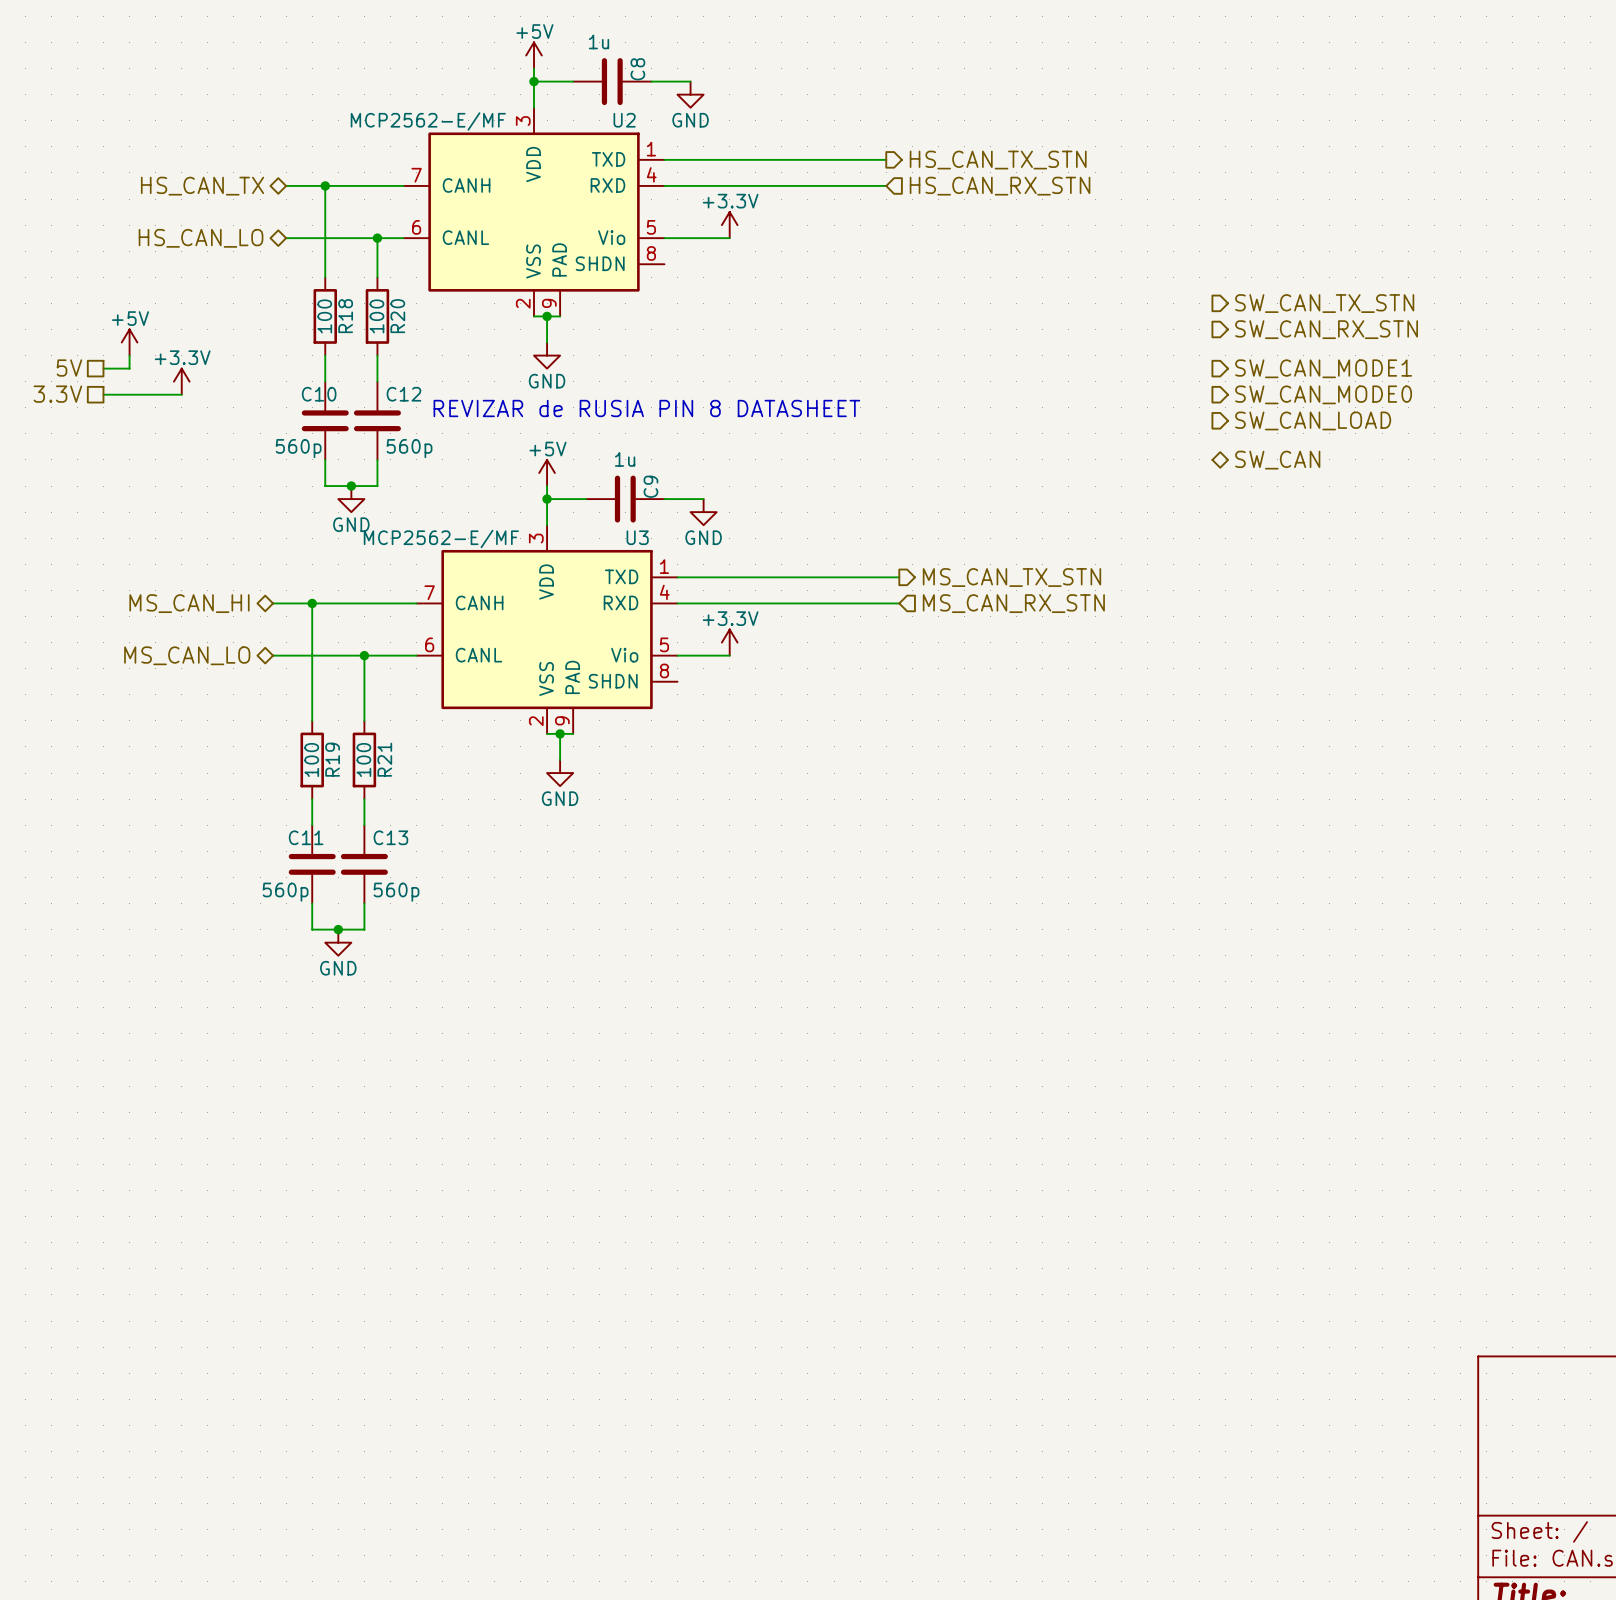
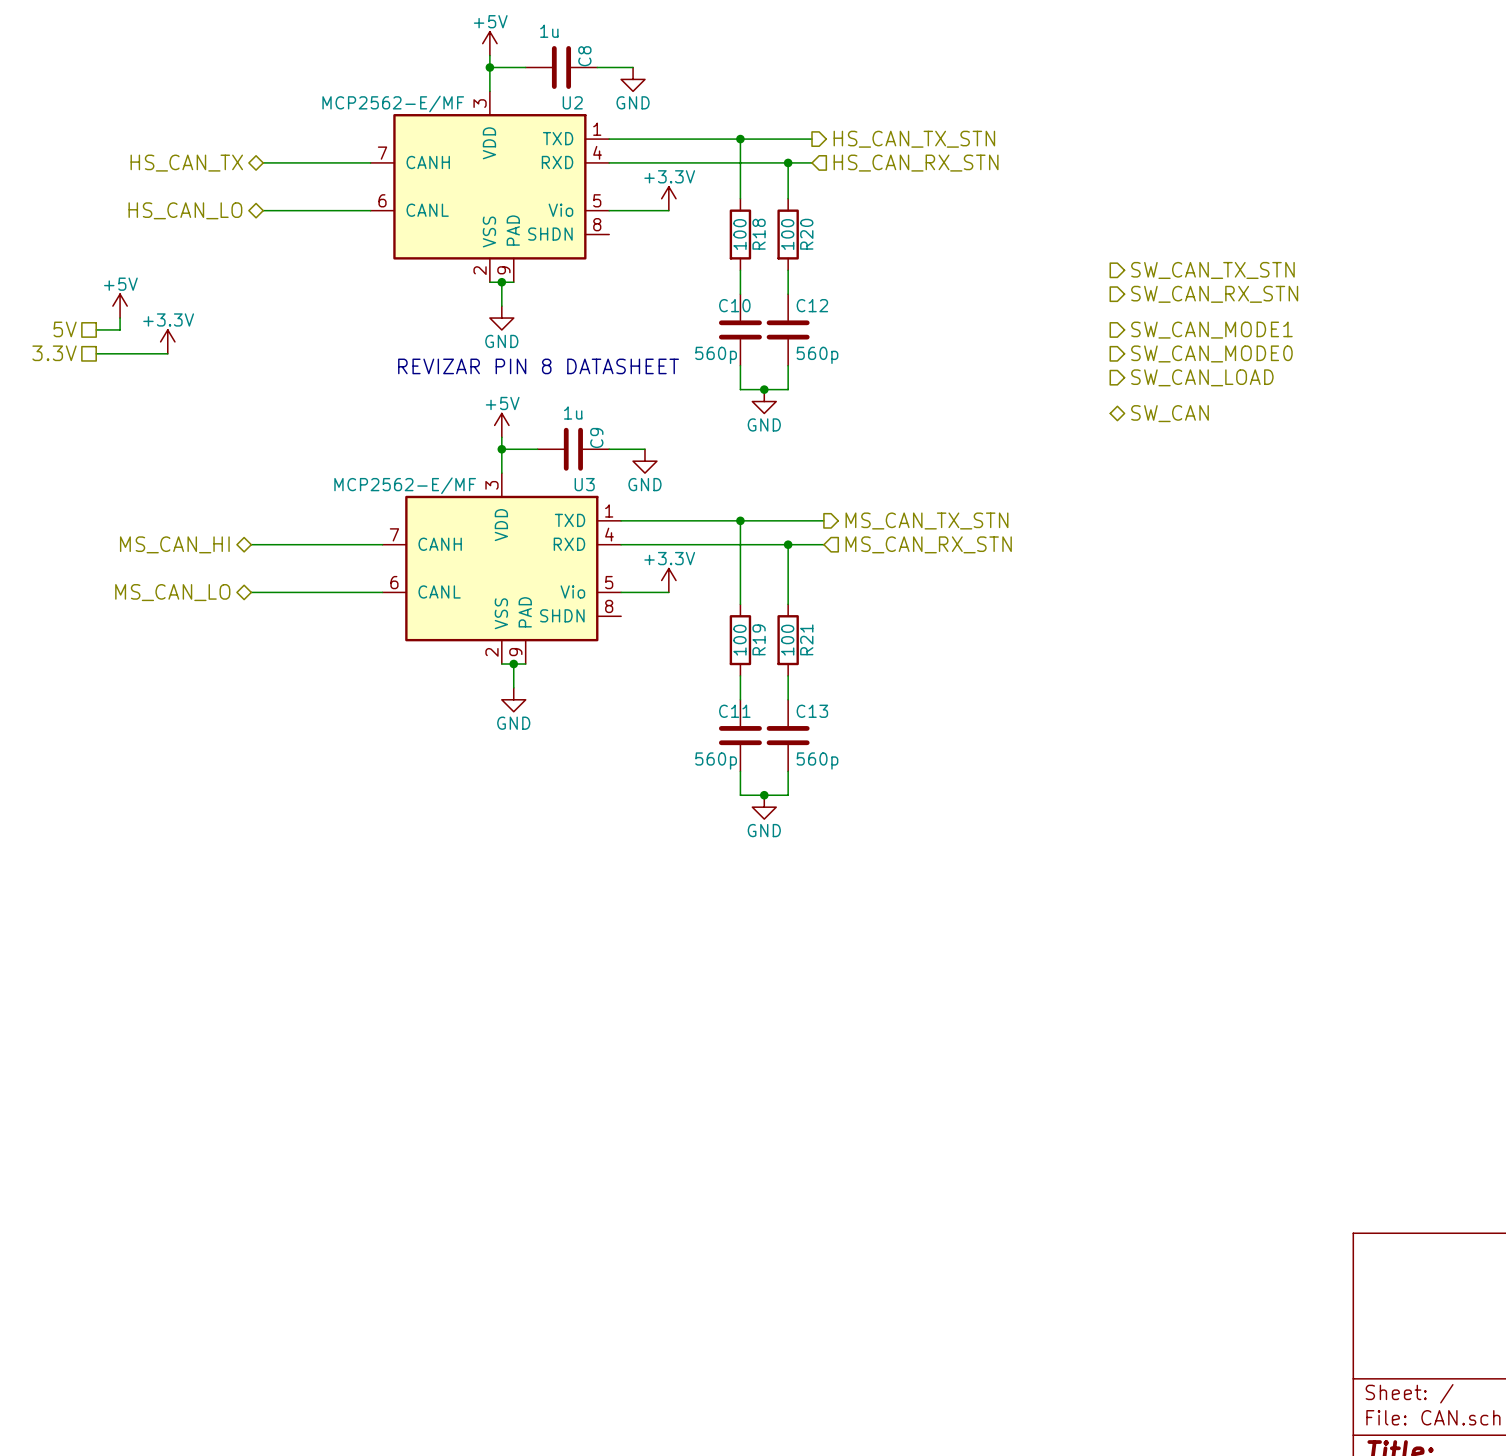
wire: none -> (740, 139) (740, 198)
junction: none -> (740, 139)
wire: (325, 185) (325, 277) -> none
junction: (325, 185) -> none
wire: none -> (788, 162) (788, 198)
junction: none -> (788, 162)
wire: (377, 238) (377, 277) -> none
junction: (377, 238) -> none
wire: none -> (740, 270) (740, 294)
wire: none -> (788, 270) (788, 294)
R18 position: (325, 316) -> (740, 234)
R20 position: (377, 316) -> (788, 234)
wire: (325, 355) (325, 381) -> none
wire: (377, 355) (377, 381) -> none
wire: none -> (740, 365) (740, 389) (788, 389) (788, 365)
text: REVIZAR de RUSIA PIN 8 DATASHEET (646, 408) -> REVIZAR PIN 8 DATASHEET (538, 366)
C10 position: (325, 420) -> (740, 329)
C12 position: (377, 420) -> (788, 329)
junction: none -> (764, 389)
power symbol: none -> GND (764, 401)
wire: (325, 459) (325, 486) (377, 486) (377, 459) -> none
junction: (351, 486) -> none
power symbol: GND (351, 499) -> none
wire: none -> (740, 520) (740, 604)
junction: none -> (740, 520)
wire: (312, 603) (312, 720) -> none
junction: (312, 603) -> none
wire: none -> (788, 544) (788, 604)
junction: none -> (788, 544)
wire: (364, 655) (364, 720) -> none
junction: (364, 655) -> none
wire: none -> (740, 675) (740, 699)
wire: none -> (788, 675) (788, 699)
R19 position: (312, 760) -> (740, 640)
R21 position: (364, 760) -> (788, 640)
wire: (312, 799) (312, 825) -> none
wire: (364, 799) (364, 825) -> none
wire: none -> (740, 771) (740, 795) (788, 795) (788, 771)
C11 position: (312, 864) -> (740, 735)
C13 position: (364, 864) -> (788, 735)
junction: none -> (764, 795)
power symbol: none -> GND (764, 807)
wire: (312, 903) (312, 929) (364, 929) (364, 903) -> none
junction: (338, 929) -> none
power symbol: GND (338, 942) -> none

